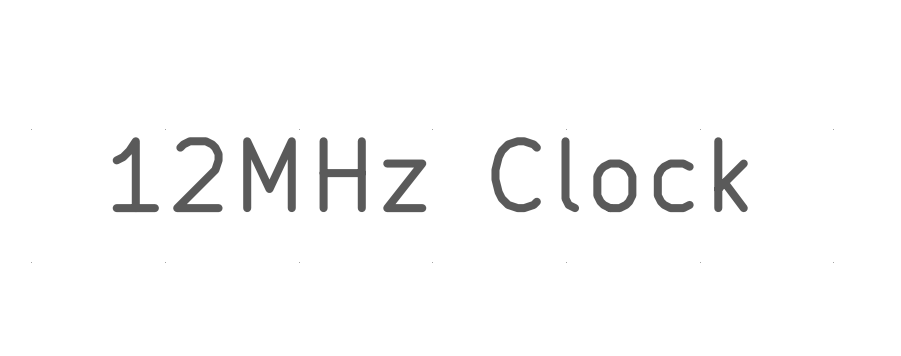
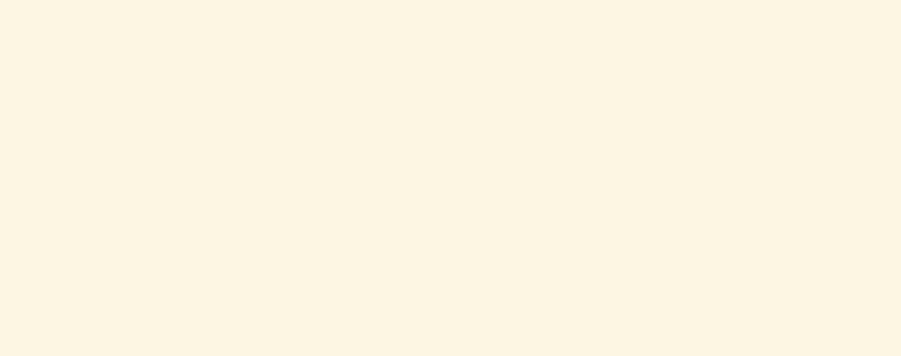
text: 12MHz Clock (430, 174) -> none

